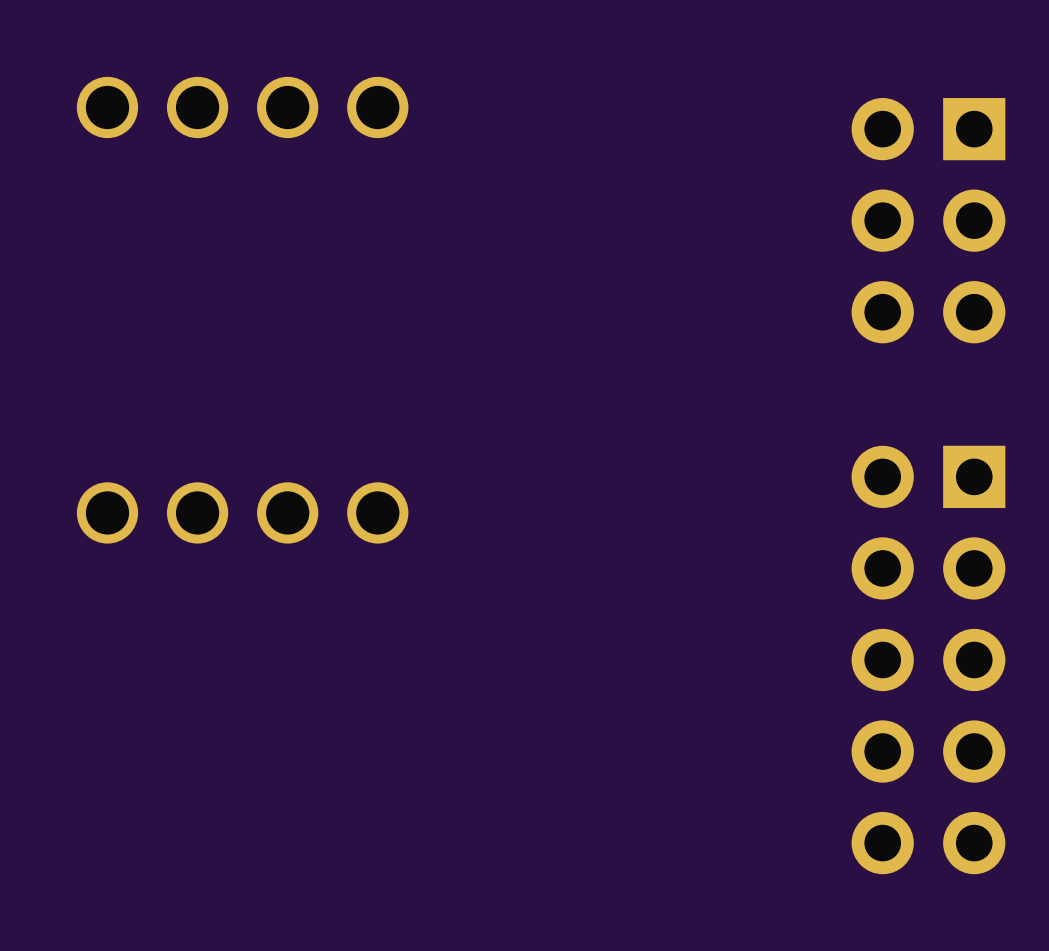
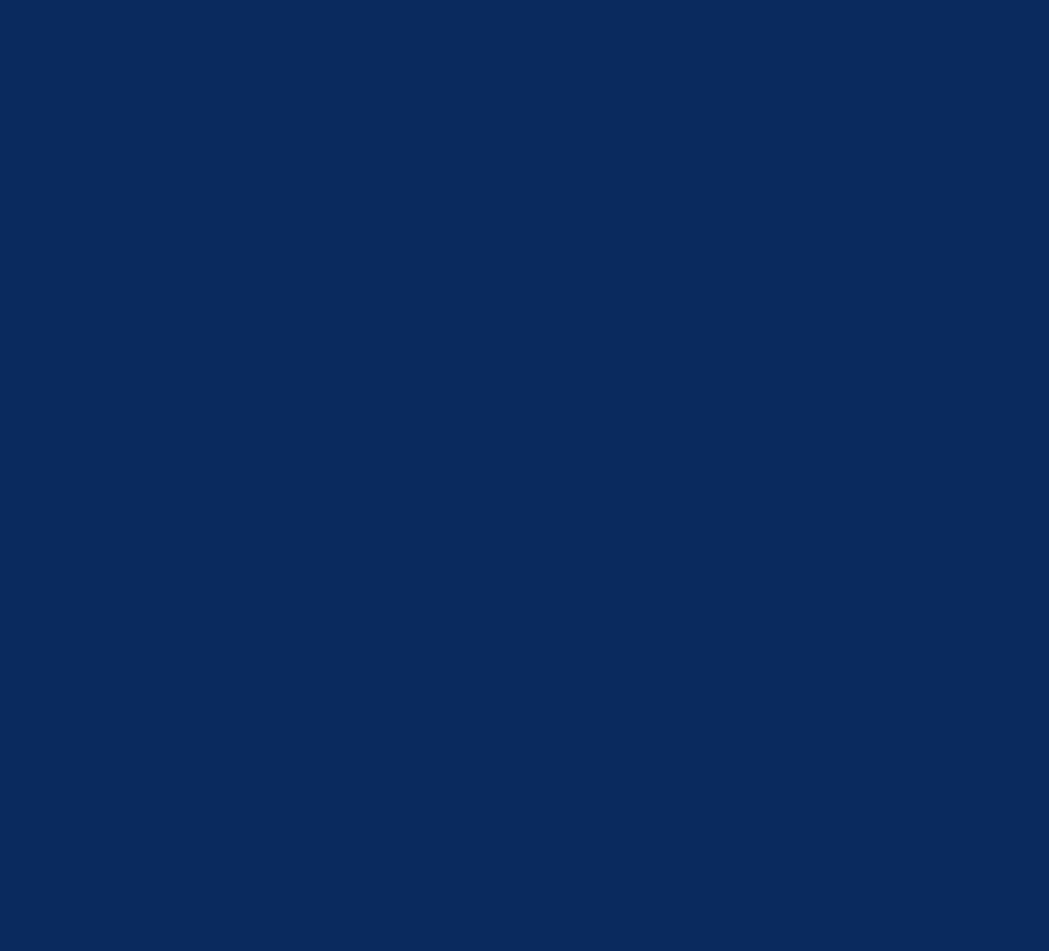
part: (242, 107) -> none
part: (928, 220) -> none
part: (242, 512) -> none
part: (928, 659) -> none

